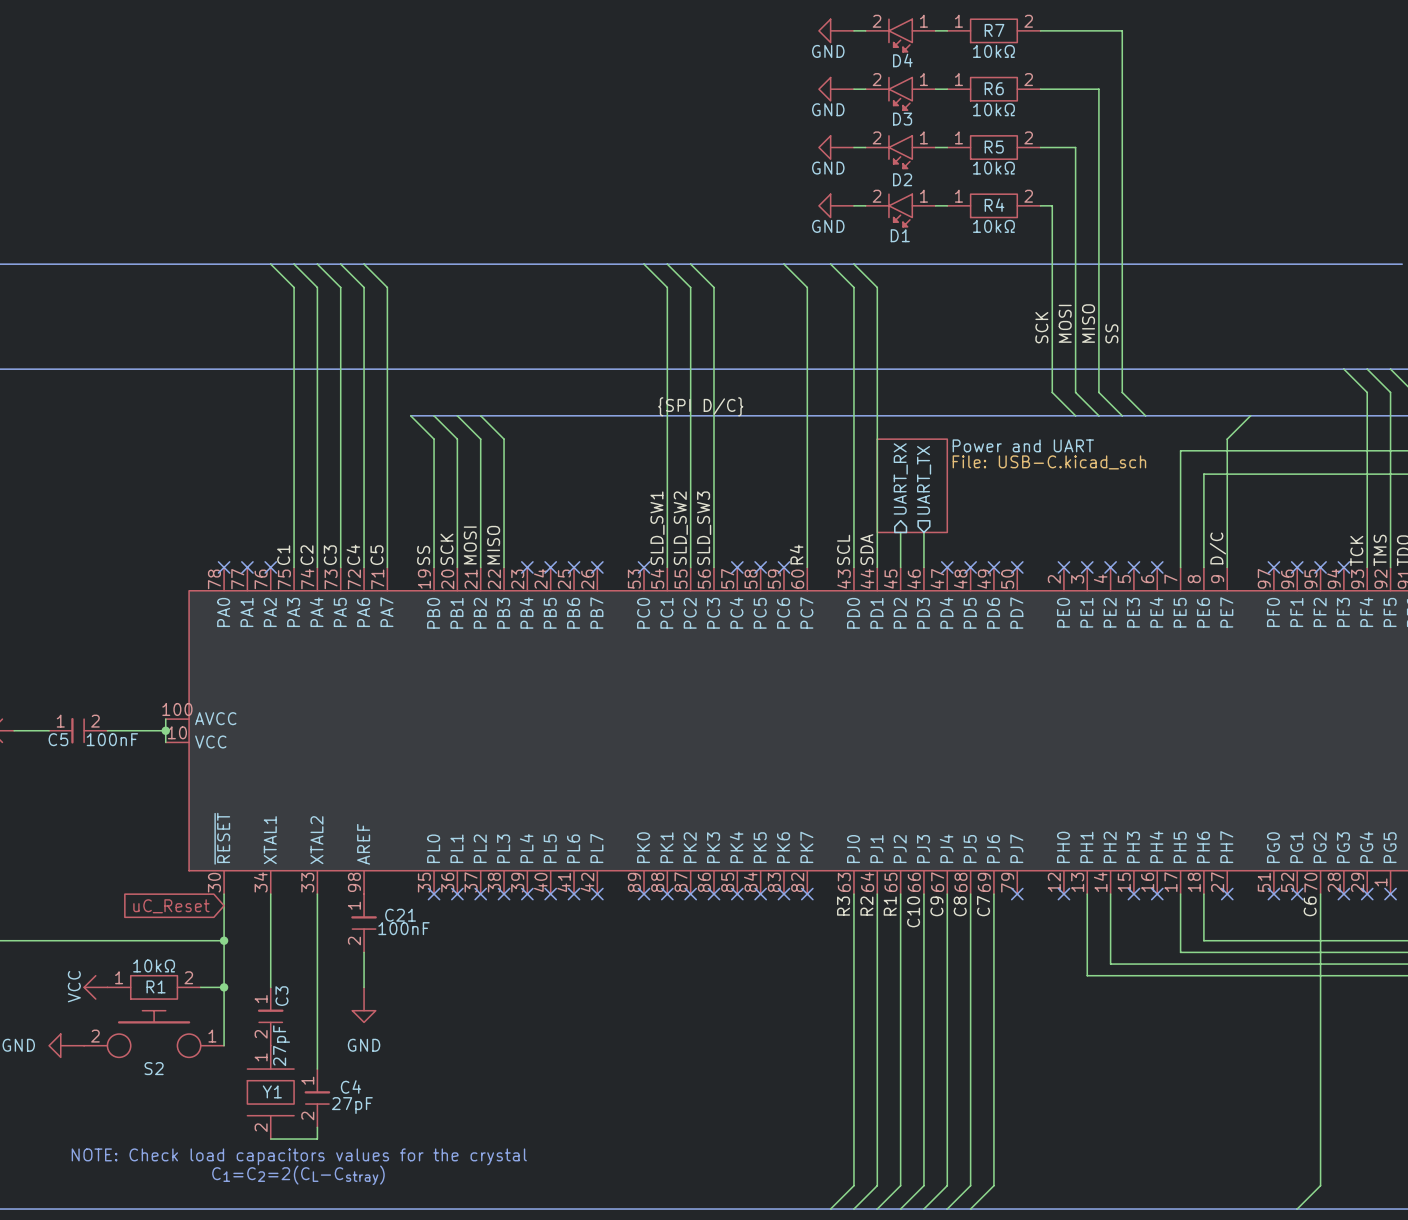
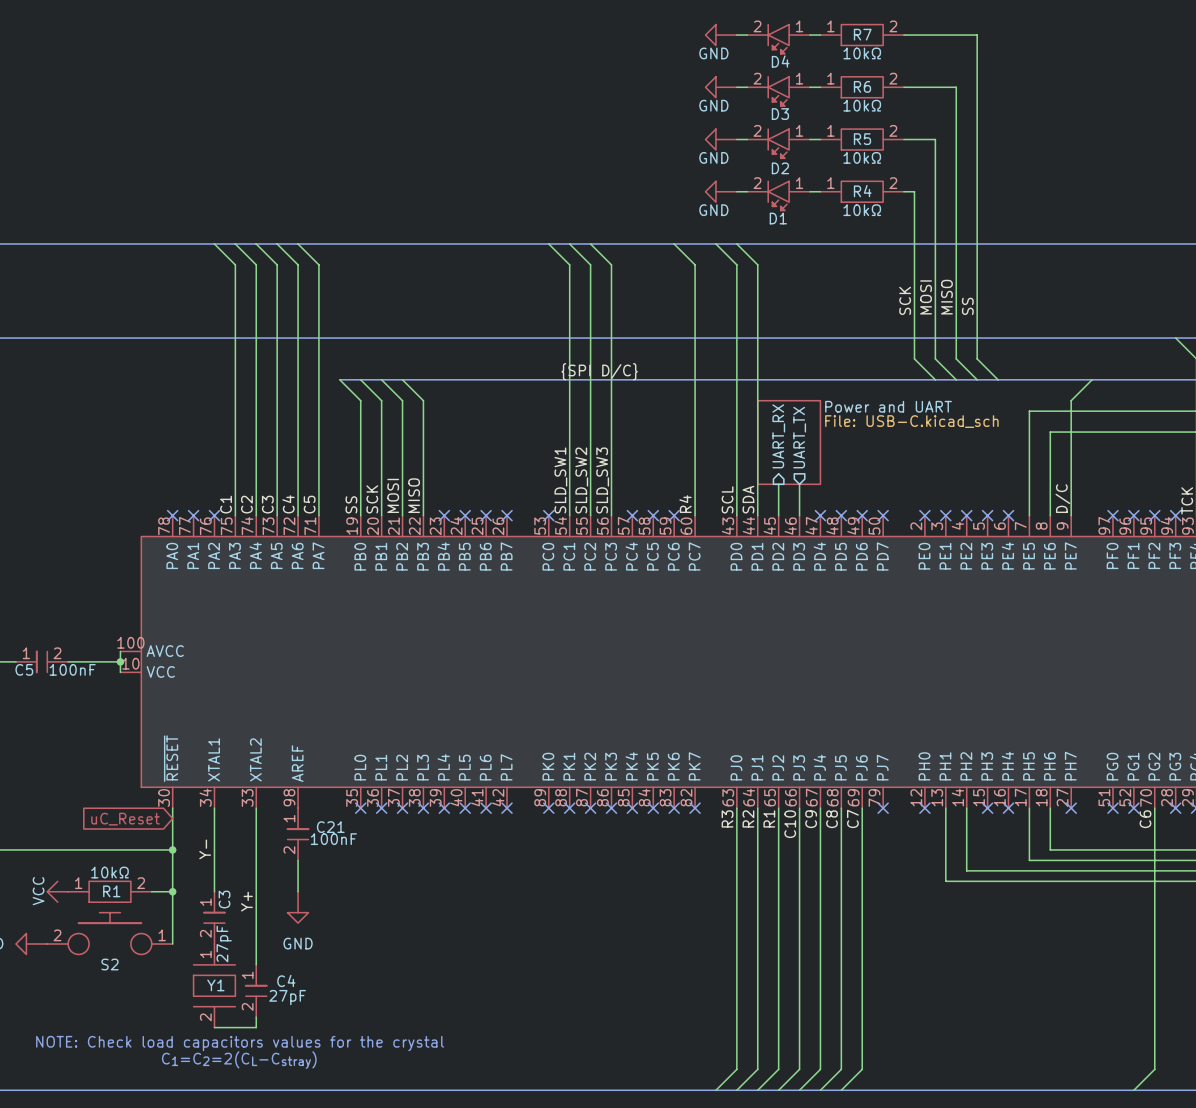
label: none -> Y- (205, 849)
label: none -> Y+ (246, 901)

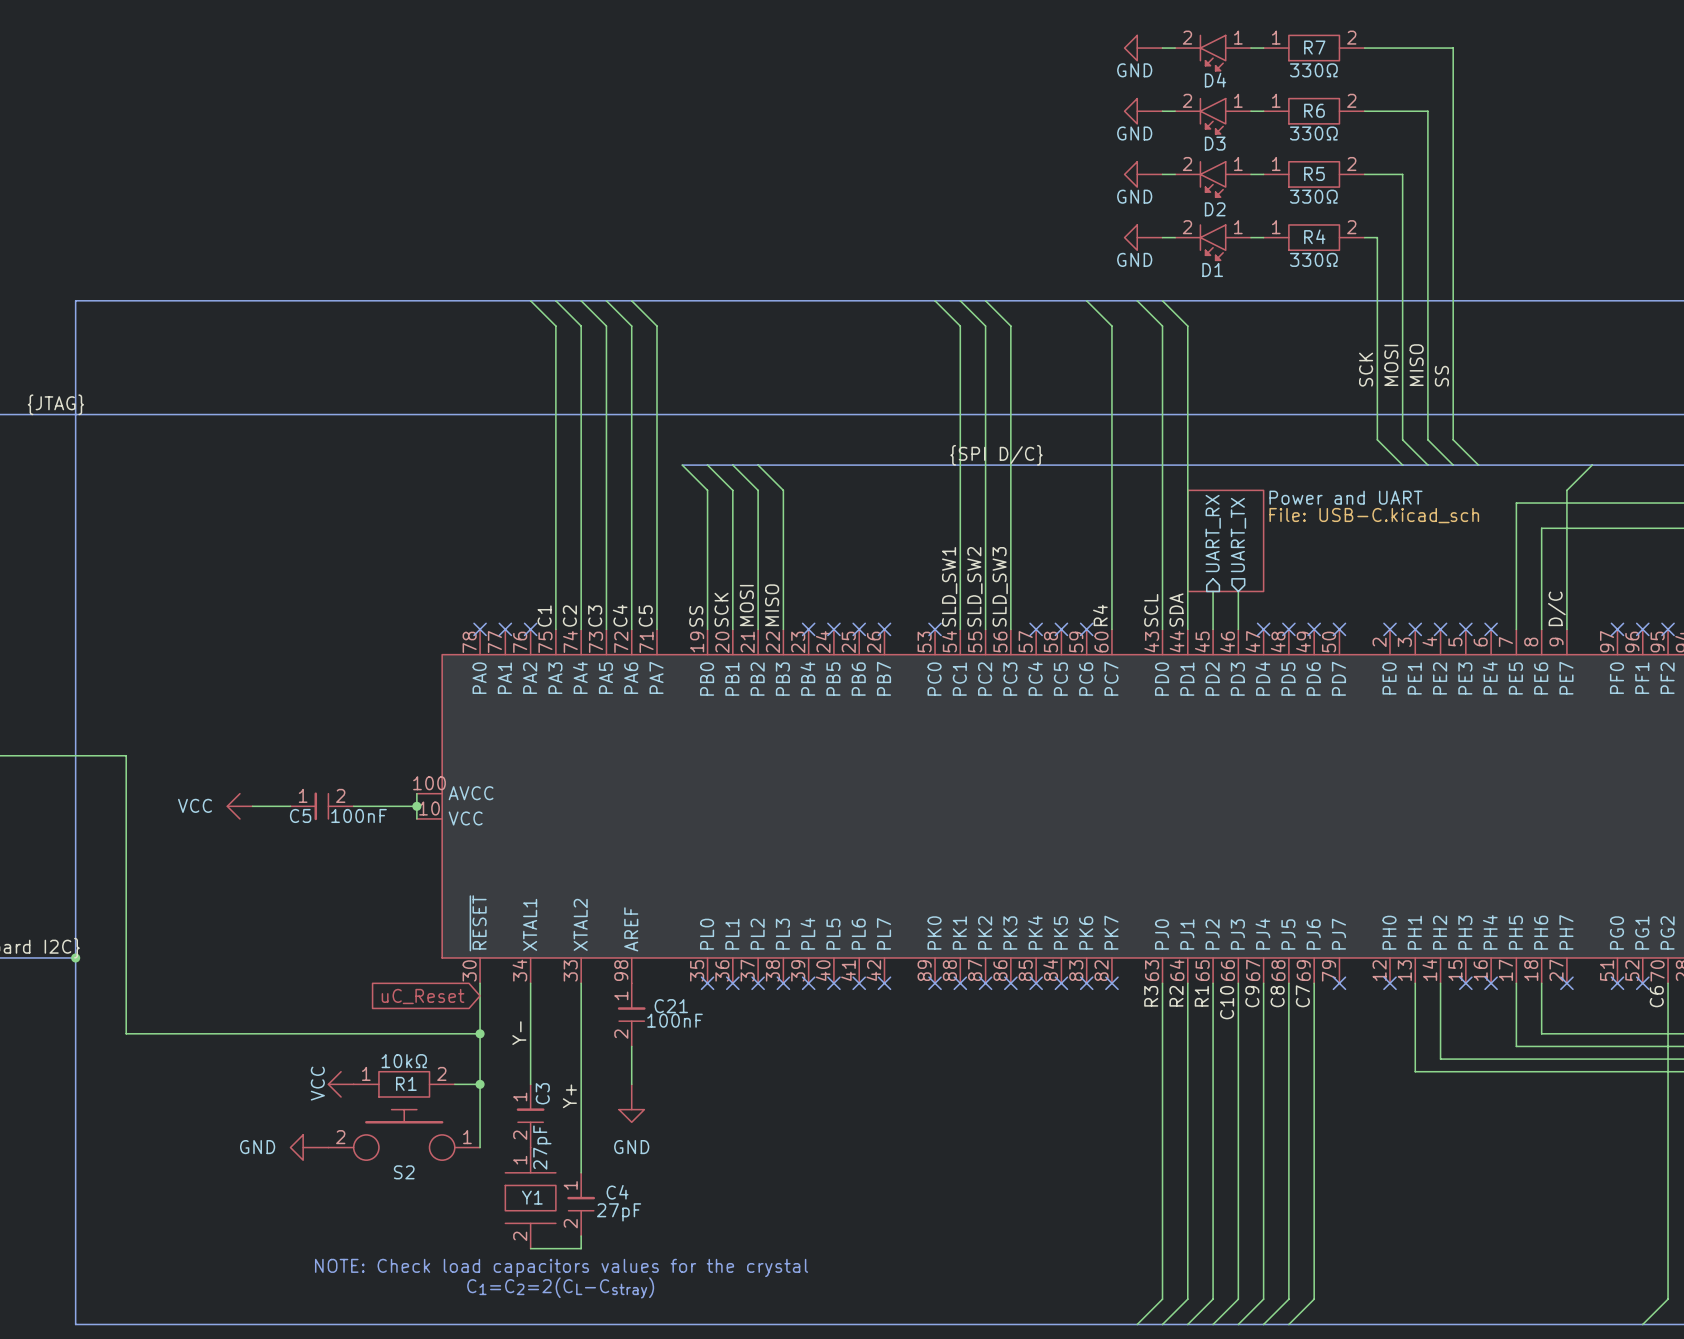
R7 value: 10kΩ (862, 53) -> 330Ω (1313, 70)
R6 value: 10kΩ (862, 105) -> 330Ω (1313, 133)
R5 value: 10kΩ (862, 157) -> 330Ω (1313, 196)
R4 value: 10kΩ (862, 210) -> 330Ω (1313, 259)

